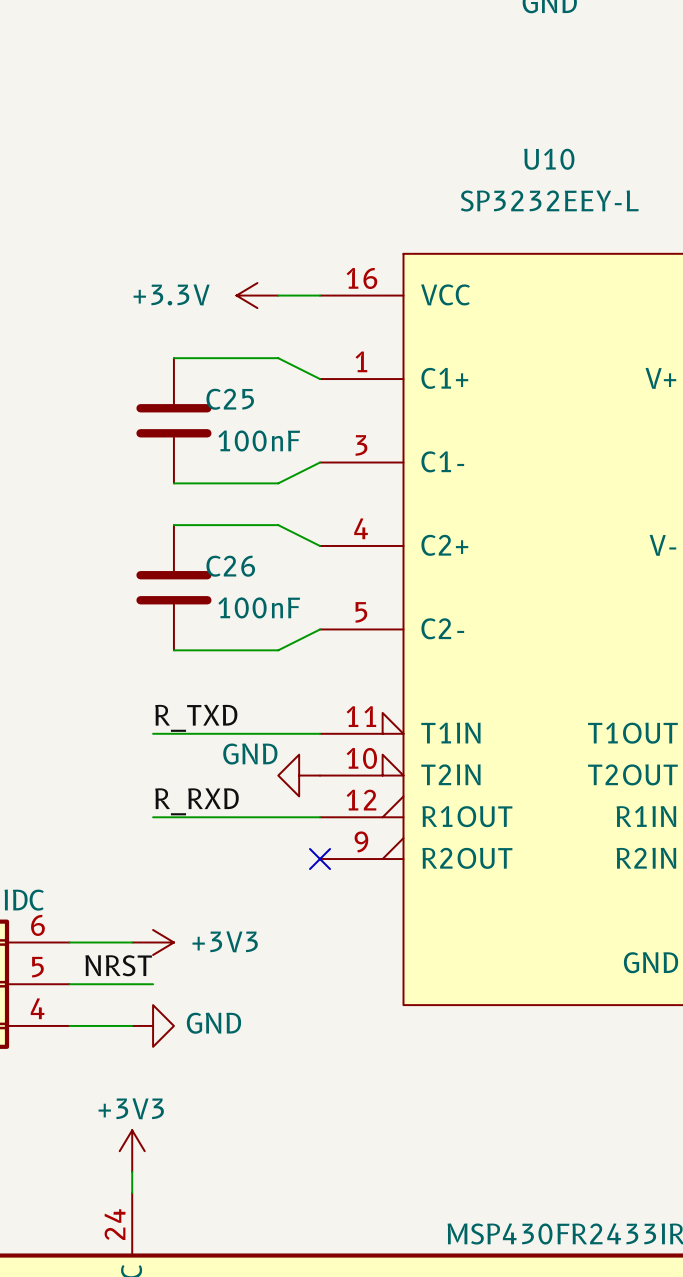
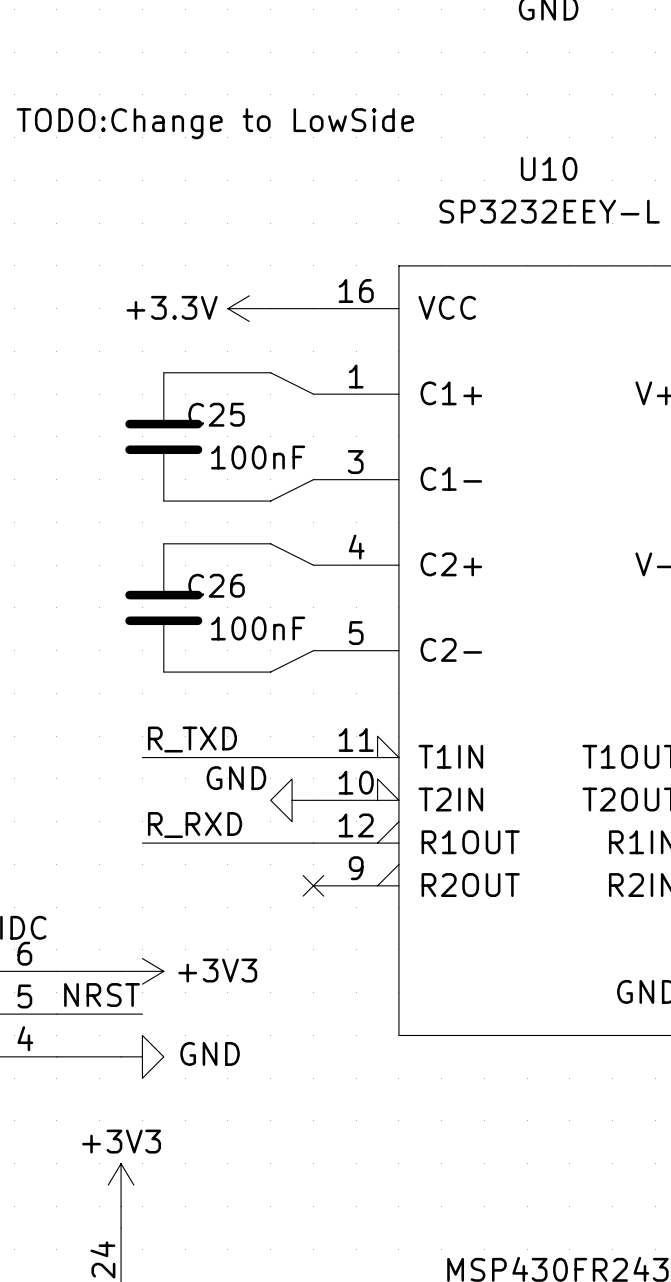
text: none -> TODO:Change to LowSide (215, 123)

